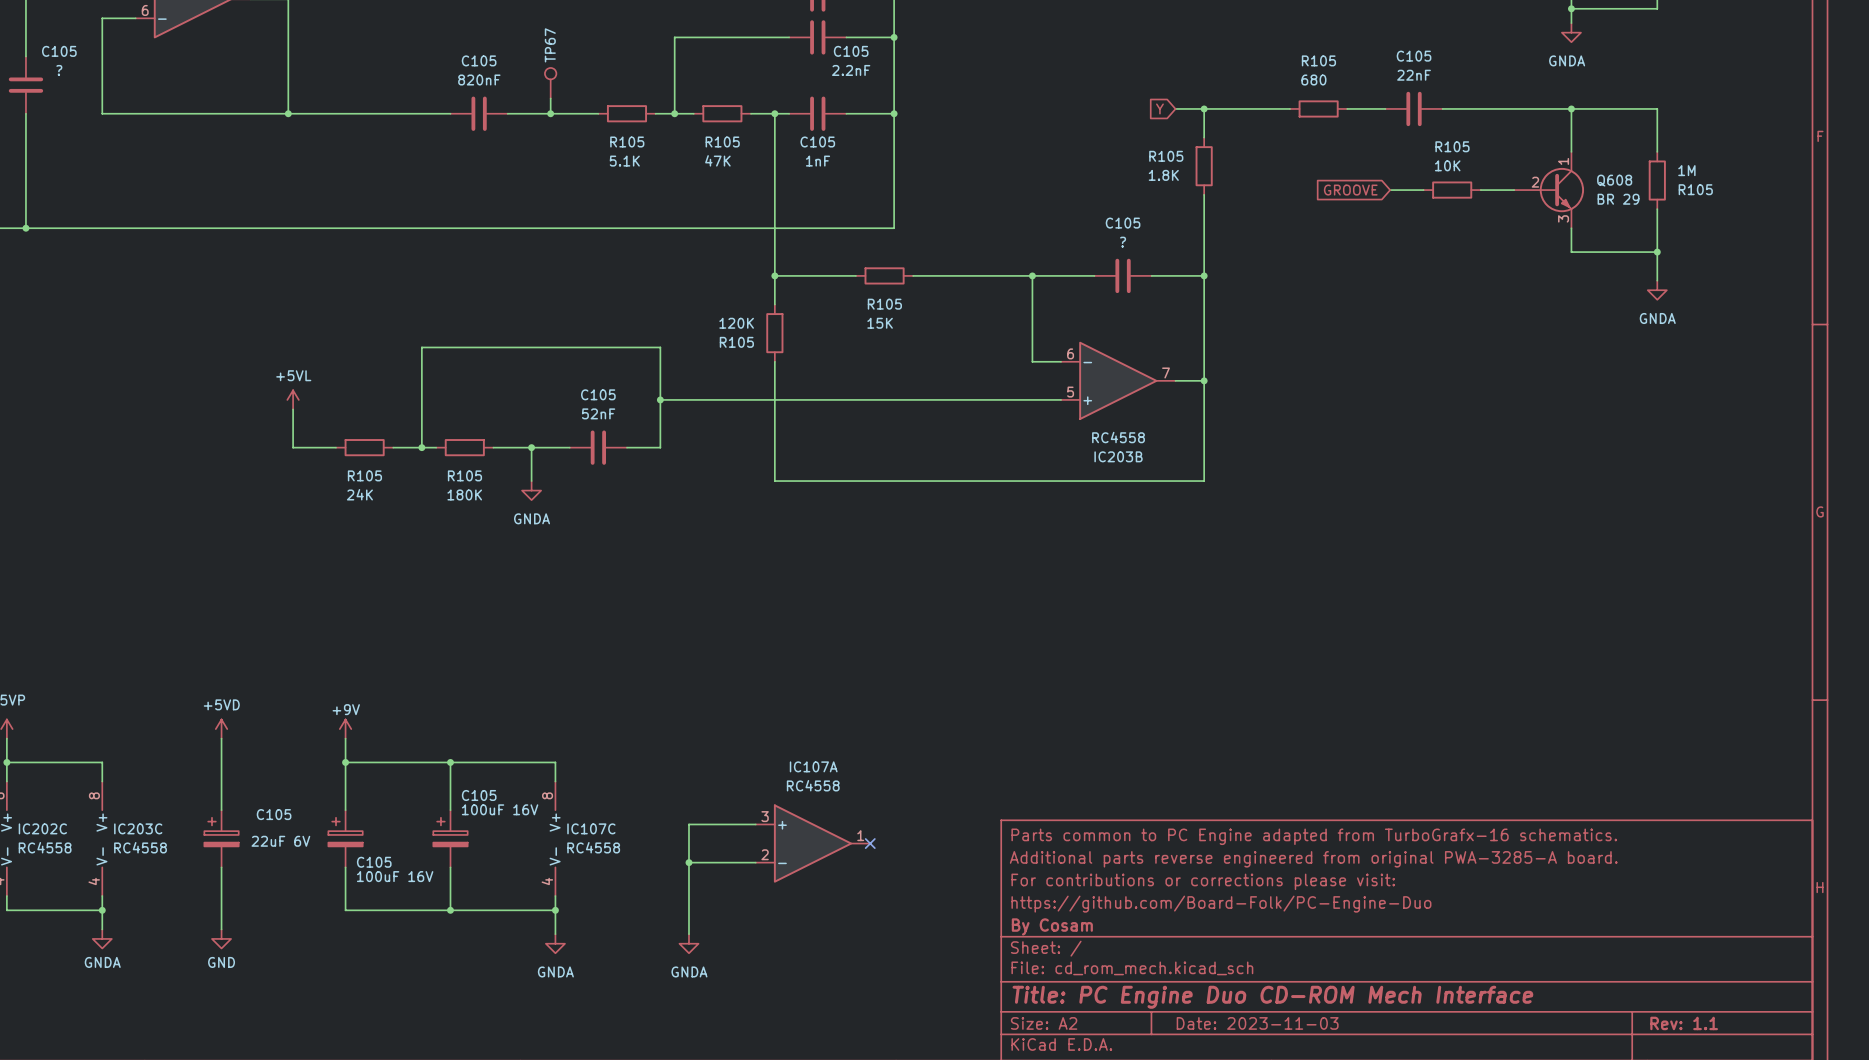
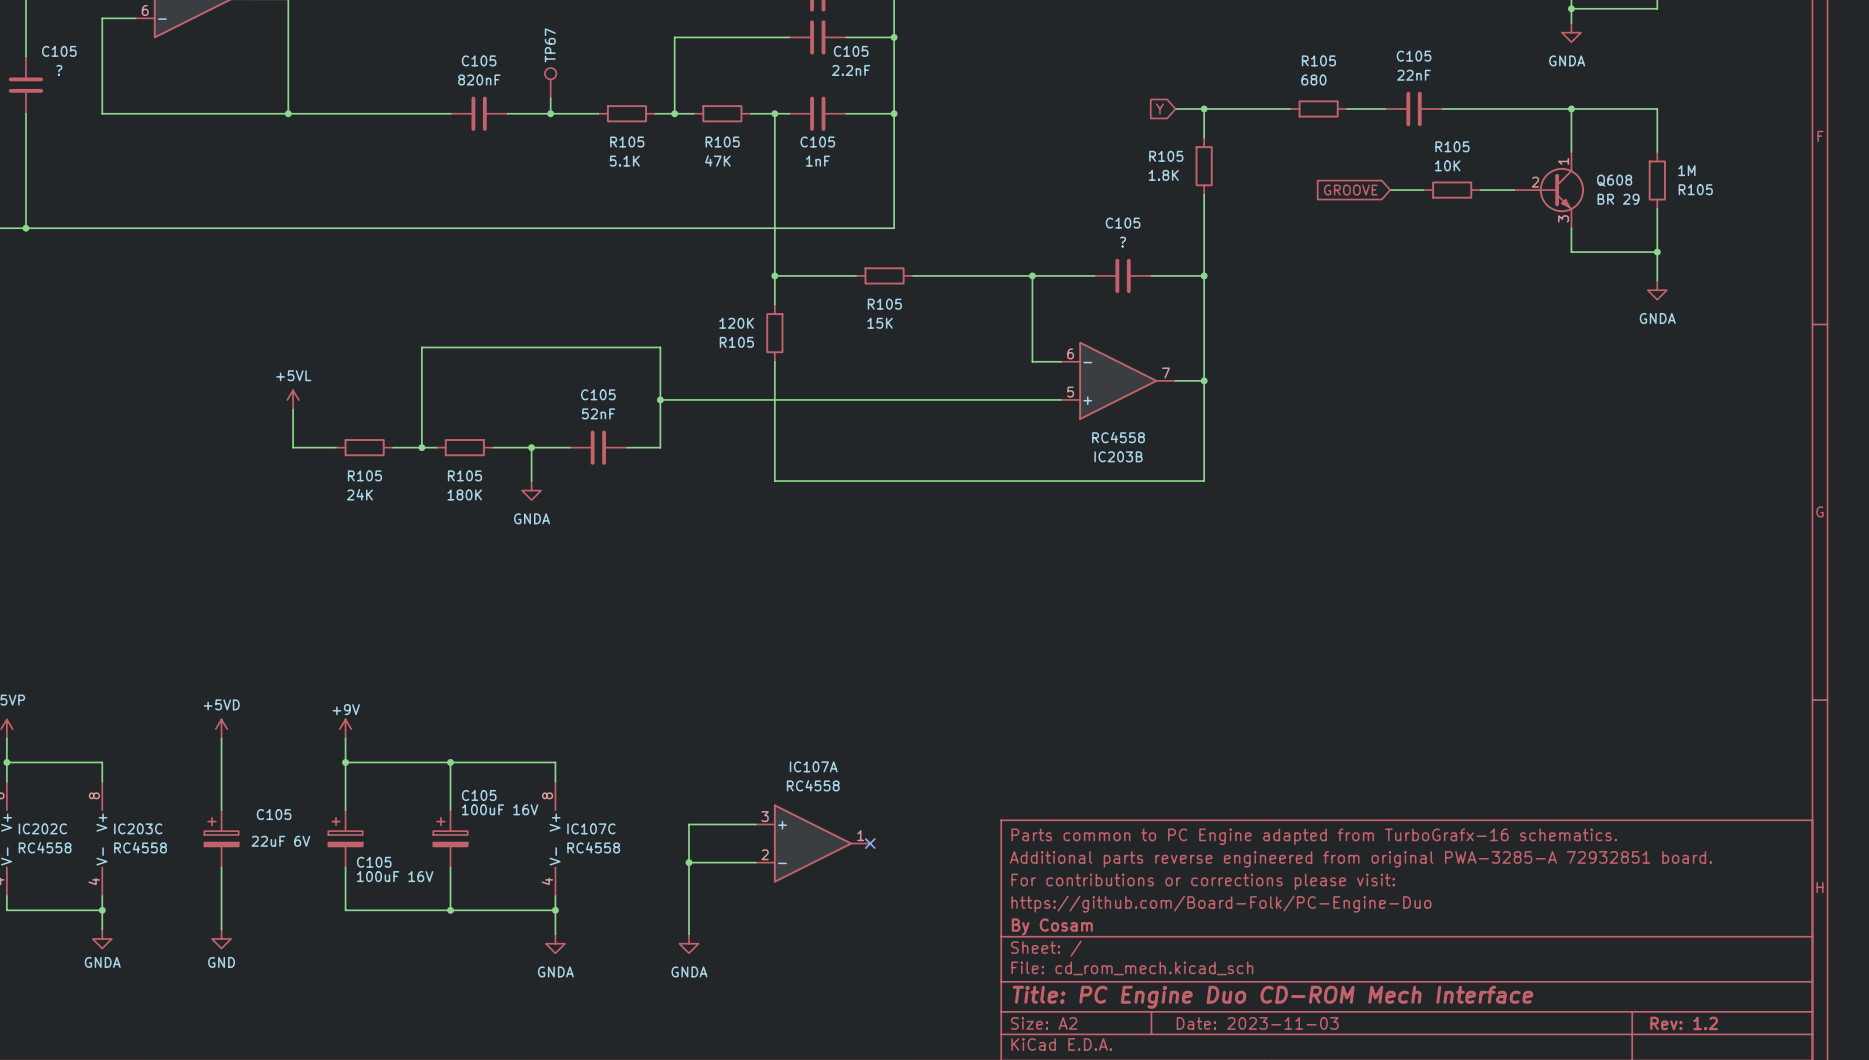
title block: Additional parts reverse engineered from original PWA-3285-A board. (1313, 859) -> Additional parts reverse engineered from original PWA-3285-A 72932851 board. (1360, 859)
title block: Rev: 1.1 (1684, 1023) -> Rev: 1.2 (1684, 1023)

